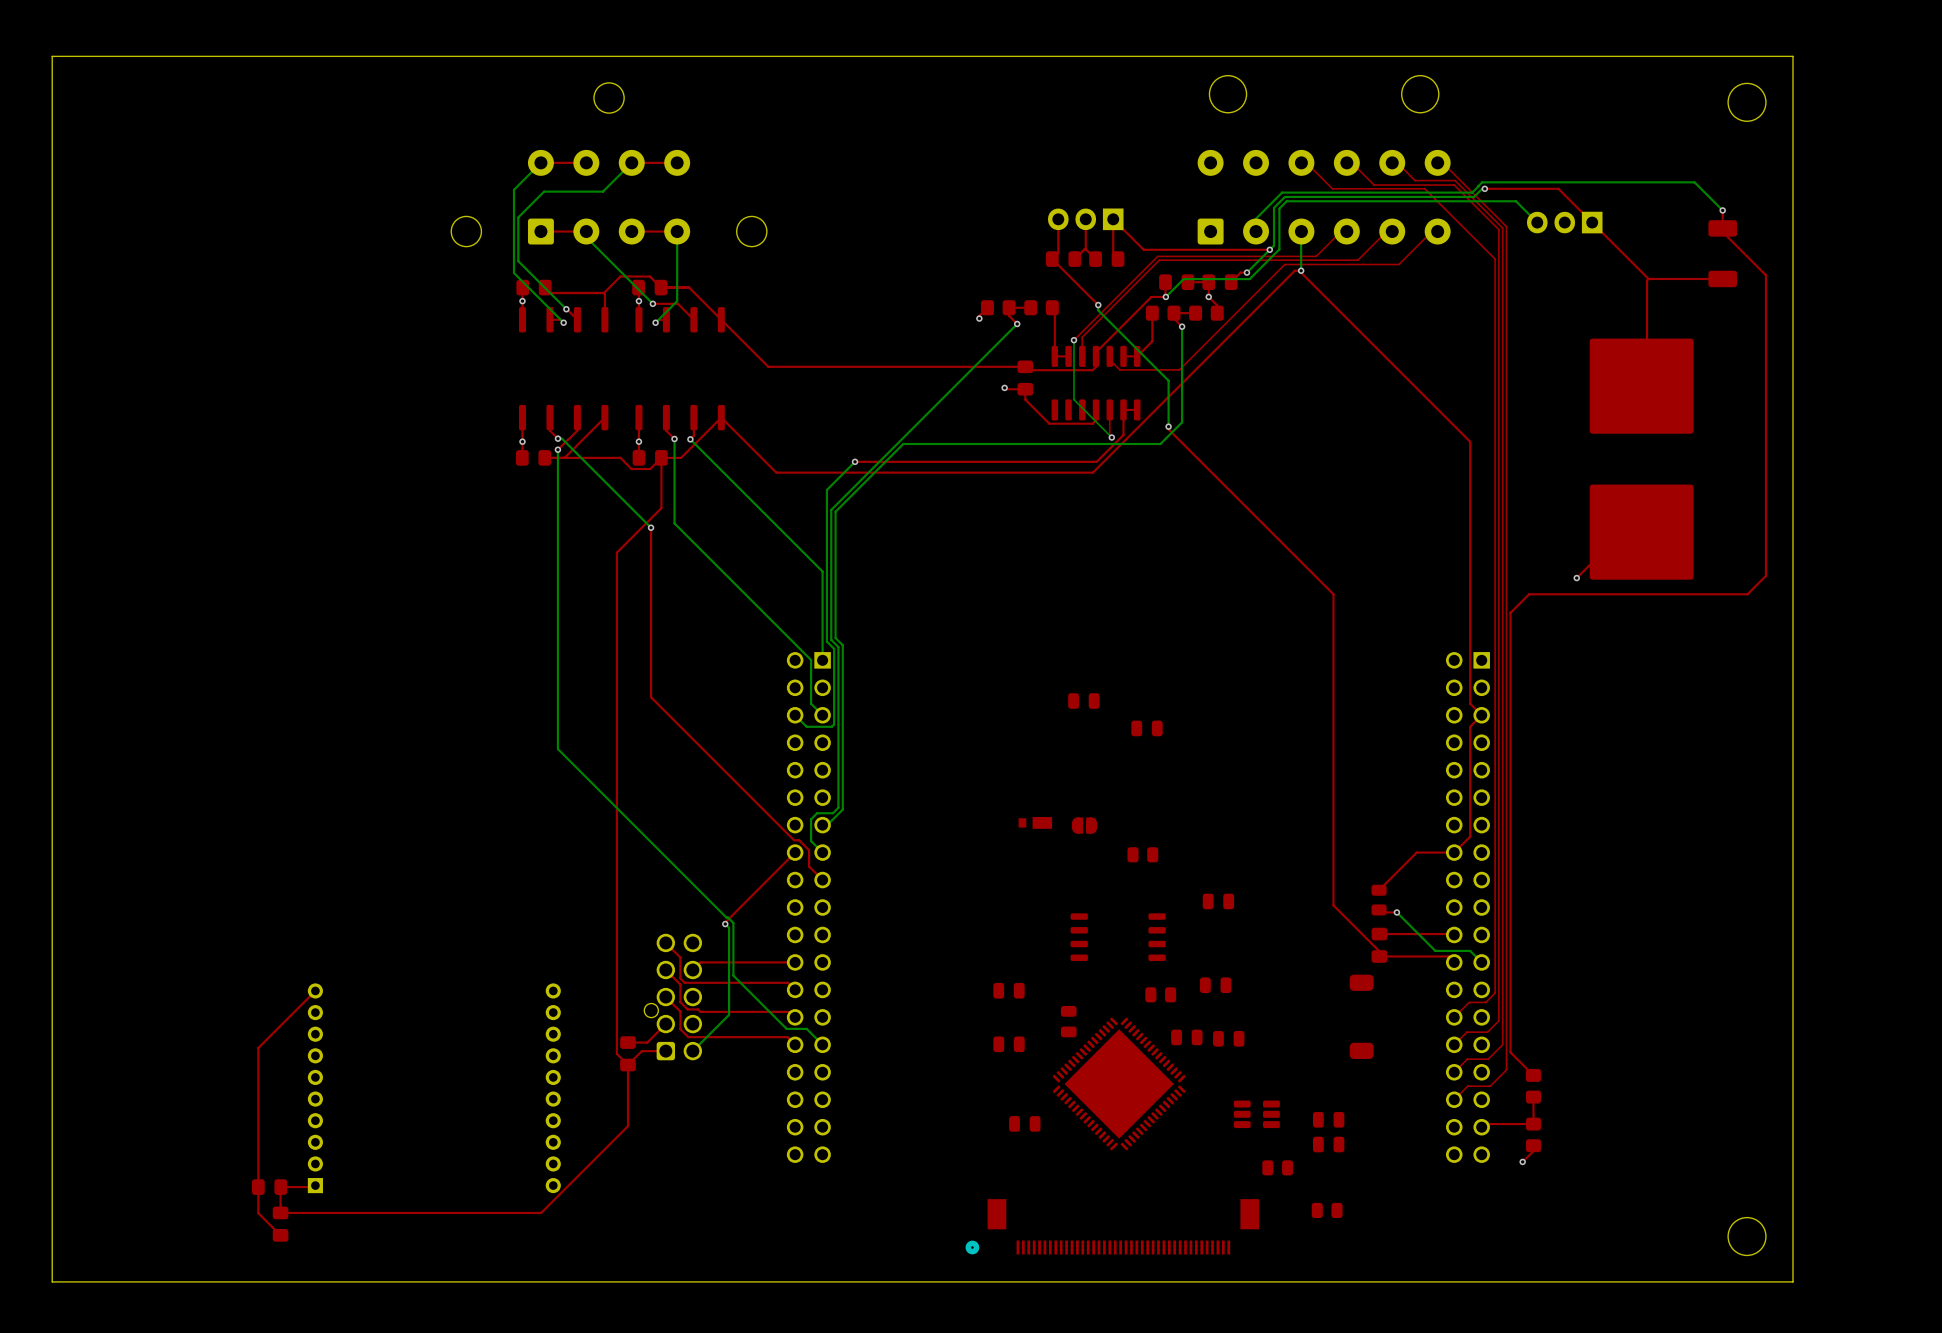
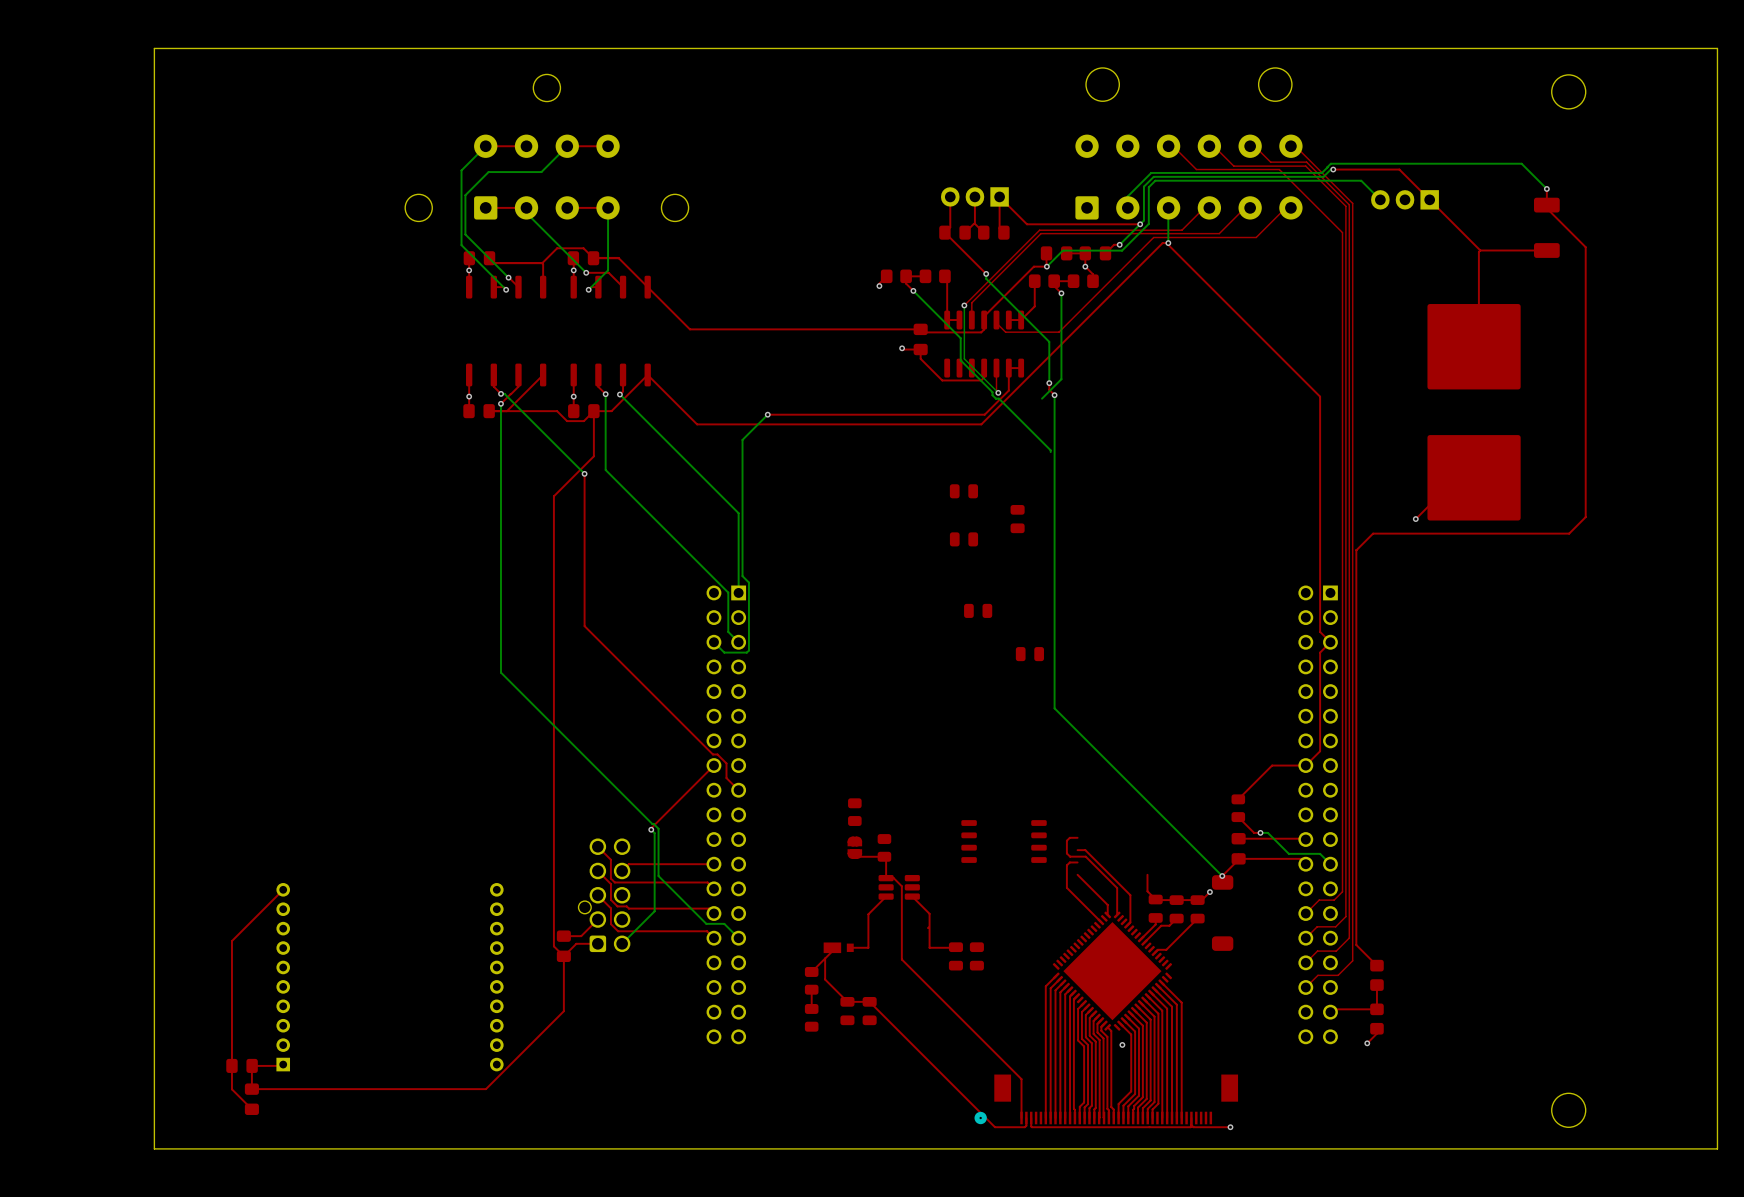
board edge: (1792, 56) (52, 56) (52, 1281) (1792, 1281) (1792, 56) -> (1717, 48) (154, 48) (154, 1148) (1717, 1148) (1717, 48)
bottom track: (1017, 323) (831, 509) (831, 639) (838, 647) (838, 807) (833, 813) (817, 813) (811, 819) (811, 841) (822, 852) -> (913, 290) (960, 338) (960, 360) (992, 392) (995, 398)
top track: (1168, 429) (1333, 594) (1333, 905) (1379, 951) -> (1049, 385) (1049, 389) (1054, 395)
bottom track: none -> (1054, 395) (1054, 708) (1222, 876)
via: none -> (1054, 395)
bottom track: (1109, 443) (903, 443) (835, 511) (835, 638) (842, 645) (842, 809) (827, 825) -> none
bottom track: (1160, 443) (1112, 443) -> (1050, 452) (999, 398)
part: none -> (963, 491)
part: none -> (1017, 519)
part: none -> (963, 539)
part position: (1083, 700) -> (978, 610)
part rotation: 0° (1035, 822) -> 180° (838, 947)
part position: (1035, 822) -> (838, 947)
part rotation: 0° (1084, 825) -> 90° clockwise (854, 847)
part position: (1084, 825) -> (854, 847)
part: (1142, 854) -> none
part: (1218, 901) -> none
part: none -> (854, 812)
top track: (1396, 912) (1381, 912) -> (1260, 832) (1254, 832) (1240, 819)
bottom track: (1396, 912) (1412, 927) -> (1260, 832) (1267, 832)
via position: (1396, 912) -> (1260, 832)
top track: none -> (1077, 837) (1069, 837) (1066, 840) (1066, 853) (1070, 856) (1085, 856) (1117, 888) (1117, 914)
part: none -> (884, 847)
top track: none -> (1077, 850) (1085, 850) (1130, 895) (1130, 922) (1127, 925)
top track: none -> (854, 854) (857, 856) (884, 856) (886, 858) (886, 878) (893, 878) (901, 886) (901, 959) (1021, 1079) (1021, 1118)
top track: none -> (1238, 858) (1222, 876)
top track: none -> (1077, 862) (1069, 862) (1066, 865) (1066, 887) (1100, 921)
top track: none -> (1077, 874) (1107, 904) (1107, 914)
top track: none -> (1147, 874) (1147, 891) (1156, 900) (1201, 900) (1209, 892)
via: none -> (1222, 876)
part footprint: [993, 982, 1025, 999] -> [878, 874, 920, 900]
part: (1215, 985) -> none
via: none -> (1209, 892)
part: (1160, 994) -> none
top track: none -> (886, 896) (868, 914) (868, 947) (850, 947)
top track: none -> (912, 896) (929, 913) (929, 947) (955, 947)
part: none -> (1155, 908)
part: none -> (1176, 909)
part: none -> (1197, 909)
part: (1068, 1021) -> none
top track: none -> (1155, 917) (1155, 924) (1141, 938)
top track: none -> (1176, 918) (1169, 925) (1161, 925) (1144, 942)
top track: none -> (1197, 918) (1166, 949) (1157, 949) (1154, 952)
top track: none -> (928, 927) (927, 928)
part: (1186, 1037) -> none
part: (1228, 1038) -> none
part: (1009, 1044) -> none
top track: none -> (832, 947) (832, 951) (811, 971)
part: none -> (955, 956)
part: none -> (976, 956)
top track: none -> (825, 958) (825, 979) (847, 1001) (869, 1001) (995, 1127) (1024, 1127) (1026, 1118)
part position: (1119, 1083) -> (1112, 971)
top track: none -> (1056, 975) (1045, 986) (1045, 1118)
top track: none -> (1059, 979) (1050, 988) (1050, 1118)
part: none -> (811, 980)
top track: none -> (1063, 982) (1055, 990) (1055, 1118)
top track: none -> (1161, 982) (1181, 1002) (1181, 1118)
top track: none -> (1066, 986) (1060, 992) (1060, 1118)
top track: none -> (1158, 986) (1176, 1004) (1176, 1118)
top track: none -> (811, 989) (811, 1008)
top track: none -> (1069, 989) (1065, 994) (1065, 1118)
top track: none -> (1154, 989) (1172, 1006) (1172, 1118)
top track: none -> (1073, 993) (1070, 996) (1070, 1117)
top track: none -> (1151, 993) (1167, 1008) (1167, 1118)
top track: none -> (1076, 996) (1073, 999) (1074, 1118)
top track: none -> (1148, 996) (1162, 1010) (1162, 1118)
top track: none -> (1144, 999) (1158, 1013) (1158, 1103) (1152, 1109) (1152, 1118)
part: (1256, 1114) -> none
top track: none -> (1083, 1003) (1078, 1008) (1078, 1040) (1084, 1046) (1084, 1102) (1079, 1106) (1079, 1118)
top track: none -> (1141, 1003) (1154, 1016) (1154, 1102) (1147, 1108) (1147, 1118)
part: (1328, 1119) -> none
top track: none -> (1087, 1006) (1081, 1011) (1081, 1038) (1088, 1044) (1088, 1104) (1084, 1107) (1084, 1118)
top track: none -> (1137, 1006) (1150, 1019) (1150, 1100) (1142, 1108) (1142, 1118)
part: (1024, 1123) -> none
top track: none -> (1090, 1010) (1085, 1014) (1085, 1037) (1091, 1043) (1091, 1105) (1089, 1108) (1089, 1118)
top track: none -> (1134, 1010) (1146, 1022) (1146, 1098) (1138, 1107) (1138, 1118)
part: none -> (847, 1011)
part: none -> (869, 1011)
top track: none -> (1094, 1013) (1089, 1017) (1089, 1035) (1095, 1041) (1094, 1118)
top track: none -> (1130, 1013) (1142, 1025) (1142, 1097) (1134, 1106) (1133, 1118)
top track: none -> (1097, 1017) (1093, 1020) (1093, 1034) (1099, 1040) (1099, 1118)
top track: none -> (1127, 1017) (1138, 1028) (1138, 1095) (1128, 1106) (1128, 1118)
part: none -> (811, 1017)
top track: none -> (1100, 1020) (1097, 1023) (1097, 1032) (1103, 1038) (1104, 1118)
top track: none -> (1124, 1020) (1135, 1031) (1135, 1094) (1123, 1105) (1123, 1118)
top track: none -> (1104, 1023) (1101, 1026) (1101, 1030) (1107, 1036) (1108, 1118)
top track: none -> (1120, 1023) (1131, 1034) (1131, 1091) (1118, 1103) (1118, 1118)
top track: none -> (1107, 1027) (1111, 1030) (1111, 1107) (1113, 1109) (1113, 1118)
part: (1328, 1144) -> none
via: none -> (1122, 1044)
part: (1277, 1167) -> none
part: (1327, 1210) -> none
part position: (1112, 1226) -> (1106, 1099)
top track: none -> (1191, 1118) (1190, 1127) (1031, 1127) (1031, 1118)
top track: none -> (1191, 1125) (1193, 1127) (1230, 1127)
via: none -> (1230, 1127)

